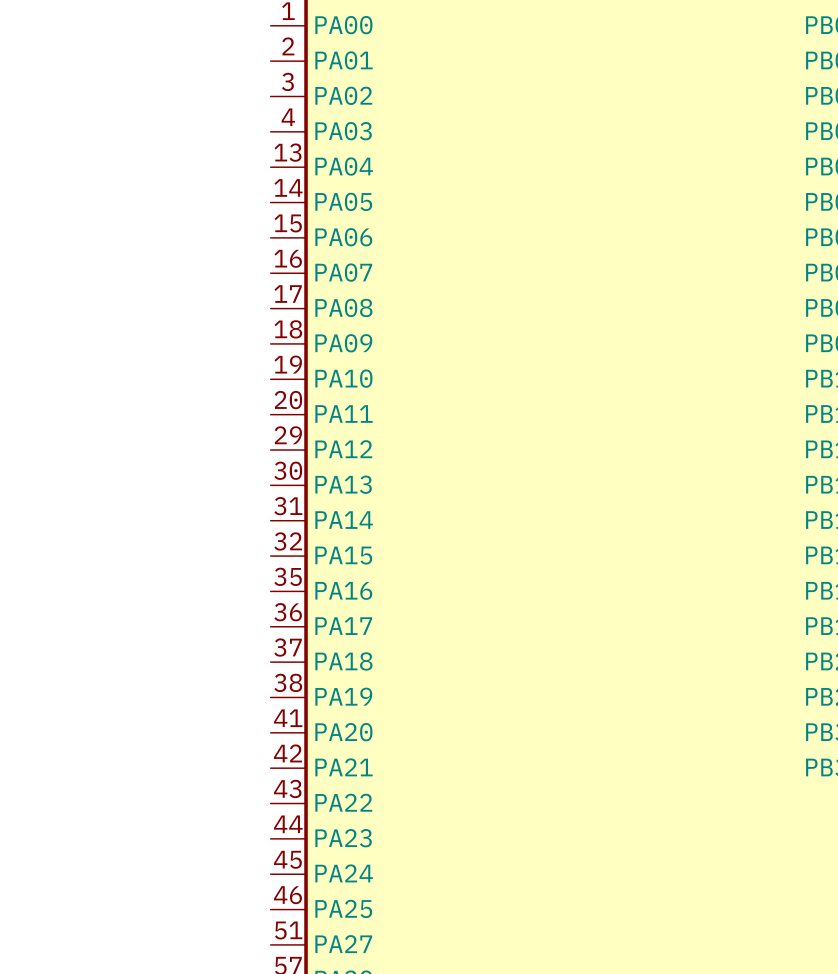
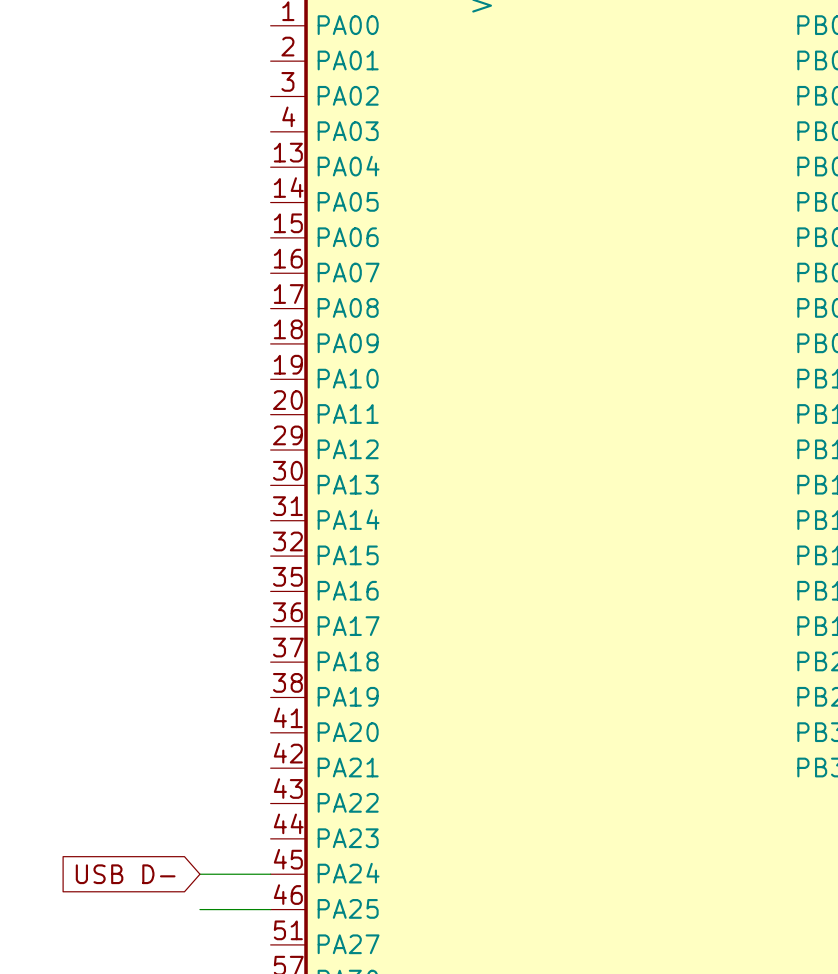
global label: none -> USB D- (125, 874)
wire: none -> (199, 874) (270, 874)
wire: none -> (199, 909) (270, 909)

